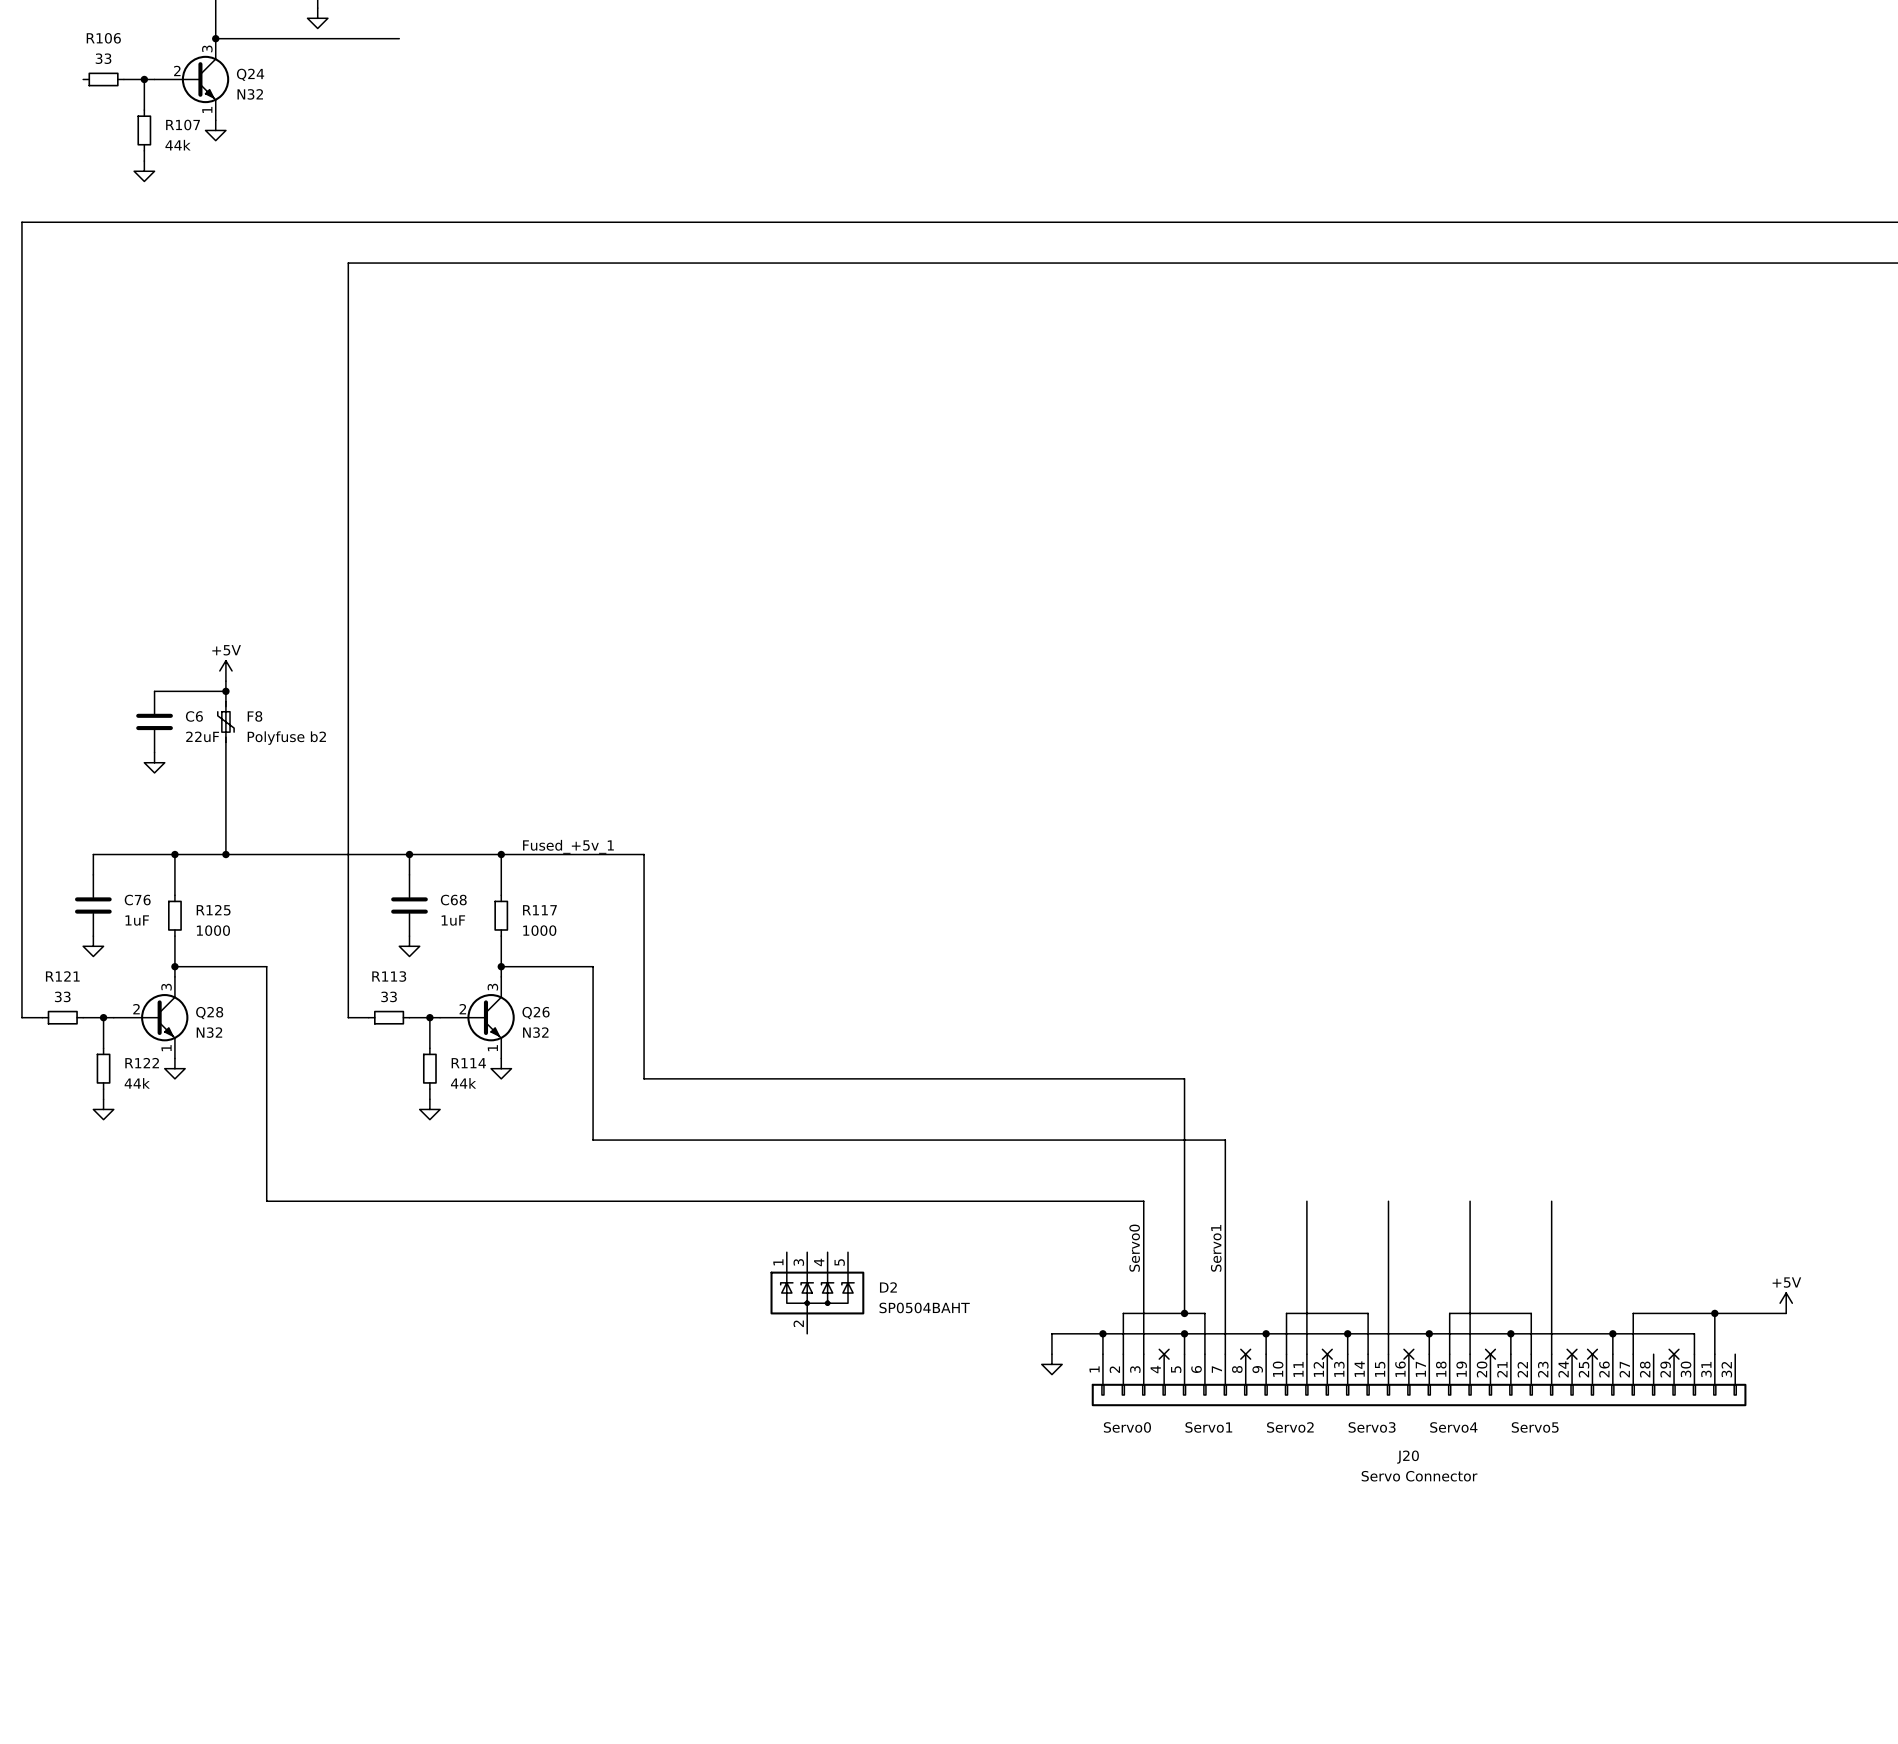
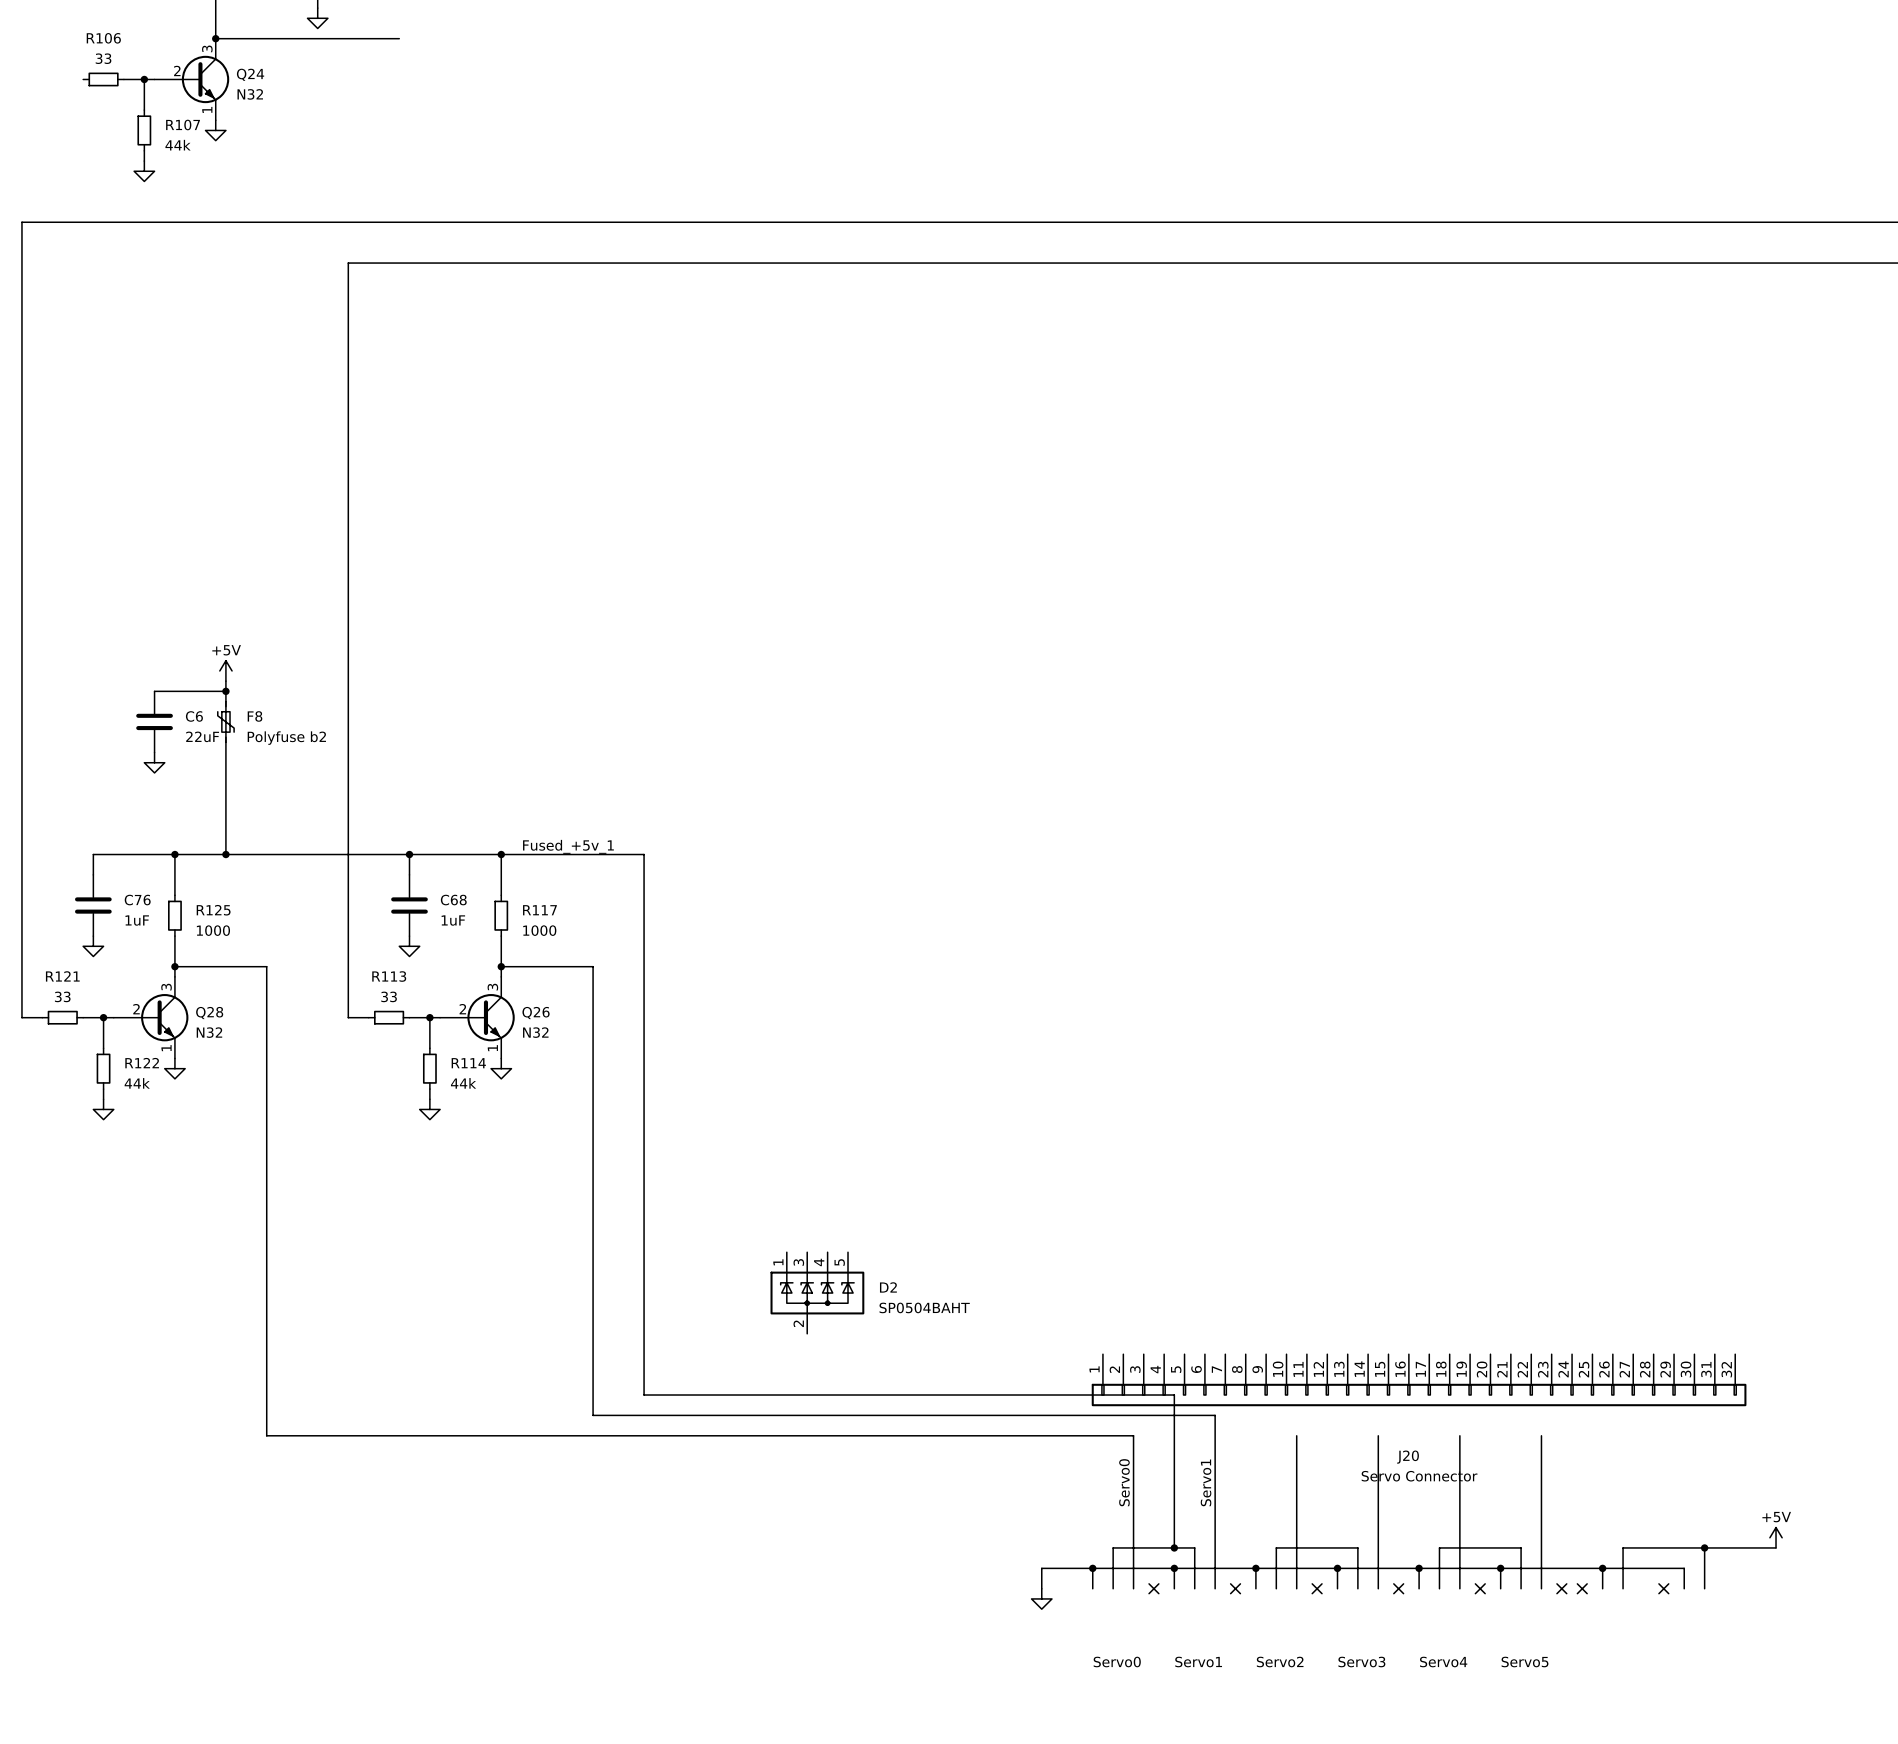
wire: (644, 1078) (1184, 1078) (1184, 1313) -> (644, 1078) (644, 1395) (1174, 1395) (1174, 1547)
wire: (593, 1140) (1225, 1140) (1225, 1354) -> (593, 1140) (593, 1415) (1215, 1415) (1215, 1588)
wire: (266, 1201) (1143, 1201) (1143, 1354) -> (266, 1201) (266, 1435) (1133, 1435) (1133, 1588)
wire: (1306, 1201) (1306, 1354) -> none
wire: (1388, 1201) (1388, 1354) -> none
wire: (1470, 1201) (1470, 1354) -> none
wire: (1551, 1201) (1551, 1354) -> none
label: Servo0 (1134, 1248) -> none
label: Servo1 (1216, 1248) -> none
power symbol: +5V (1786, 1303) -> none
junction: (1184, 1313) -> none
wire: (1714, 1313) (1714, 1354) -> none
junction: (1714, 1313) -> none
wire: (1786, 1313) (1633, 1313) (1633, 1354) -> none
wire: (1102, 1333) (1102, 1354) -> none
junction: (1102, 1333) -> none
wire: (1184, 1333) (1184, 1354) -> none
junction: (1184, 1333) -> none
wire: (1266, 1333) (1266, 1354) -> none
junction: (1266, 1333) -> none
wire: (1347, 1333) (1347, 1354) -> none
junction: (1347, 1333) -> none
wire: (1429, 1333) (1429, 1354) -> none
junction: (1429, 1333) -> none
wire: (1510, 1333) (1510, 1354) -> none
junction: (1510, 1333) -> none
wire: (1612, 1333) (1612, 1354) -> none
junction: (1612, 1333) -> none
wire: (1051, 1354) (1051, 1333) (1694, 1333) (1694, 1354) -> none
wire: (1123, 1354) (1123, 1313) (1204, 1313) (1204, 1354) -> none
no-connect mark: (1164, 1354) -> none
no-connect mark: (1245, 1354) -> none
wire: (1286, 1354) (1286, 1313) (1368, 1313) (1368, 1354) -> none
no-connect mark: (1327, 1354) -> none
no-connect mark: (1408, 1354) -> none
wire: (1449, 1354) (1449, 1313) (1531, 1313) (1531, 1354) -> none
no-connect mark: (1490, 1354) -> none
no-connect mark: (1572, 1354) -> none
no-connect mark: (1592, 1354) -> none
no-connect mark: (1674, 1354) -> none
power symbol: (1051, 1364) -> none
text: Servo0 (1127, 1427) -> none
text: Servo1 (1208, 1427) -> none
text: Servo2 (1290, 1427) -> none
text: Servo3 (1372, 1427) -> none
text: Servo4 (1453, 1427) -> none
text: Servo5 (1535, 1427) -> none
wire: none -> (1296, 1435) (1296, 1588)
wire: none -> (1378, 1435) (1378, 1588)
wire: none -> (1459, 1435) (1459, 1588)
wire: none -> (1541, 1435) (1541, 1588)
label: none -> Servo0 (1124, 1482)
label: none -> Servo1 (1206, 1482)
power symbol: none -> +5V (1776, 1537)
junction: none -> (1174, 1547)
wire: none -> (1704, 1547) (1704, 1588)
junction: none -> (1704, 1547)
wire: none -> (1776, 1547) (1623, 1547) (1623, 1588)
wire: none -> (1092, 1568) (1092, 1588)
junction: none -> (1092, 1568)
wire: none -> (1174, 1568) (1174, 1588)
junction: none -> (1174, 1568)
wire: none -> (1255, 1568) (1255, 1588)
junction: none -> (1255, 1568)
wire: none -> (1337, 1568) (1337, 1588)
junction: none -> (1337, 1568)
wire: none -> (1419, 1568) (1419, 1588)
junction: none -> (1419, 1568)
wire: none -> (1500, 1568) (1500, 1588)
junction: none -> (1500, 1568)
wire: none -> (1602, 1568) (1602, 1588)
junction: none -> (1602, 1568)
wire: none -> (1041, 1588) (1041, 1568) (1684, 1568) (1684, 1588)
wire: none -> (1113, 1588) (1113, 1547) (1194, 1547) (1194, 1588)
no-connect mark: none -> (1153, 1588)
no-connect mark: none -> (1235, 1588)
wire: none -> (1276, 1588) (1276, 1547) (1357, 1547) (1357, 1588)
no-connect mark: none -> (1317, 1588)
no-connect mark: none -> (1398, 1588)
wire: none -> (1439, 1588) (1439, 1547) (1521, 1547) (1521, 1588)
no-connect mark: none -> (1480, 1588)
no-connect mark: none -> (1561, 1588)
no-connect mark: none -> (1582, 1588)
no-connect mark: none -> (1663, 1588)
power symbol: none -> (1041, 1598)
text: none -> Servo0 (1117, 1662)
text: none -> Servo1 (1198, 1662)
text: none -> Servo2 (1280, 1662)
text: none -> Servo3 (1361, 1662)
text: none -> Servo4 (1443, 1662)
text: none -> Servo5 (1525, 1662)

